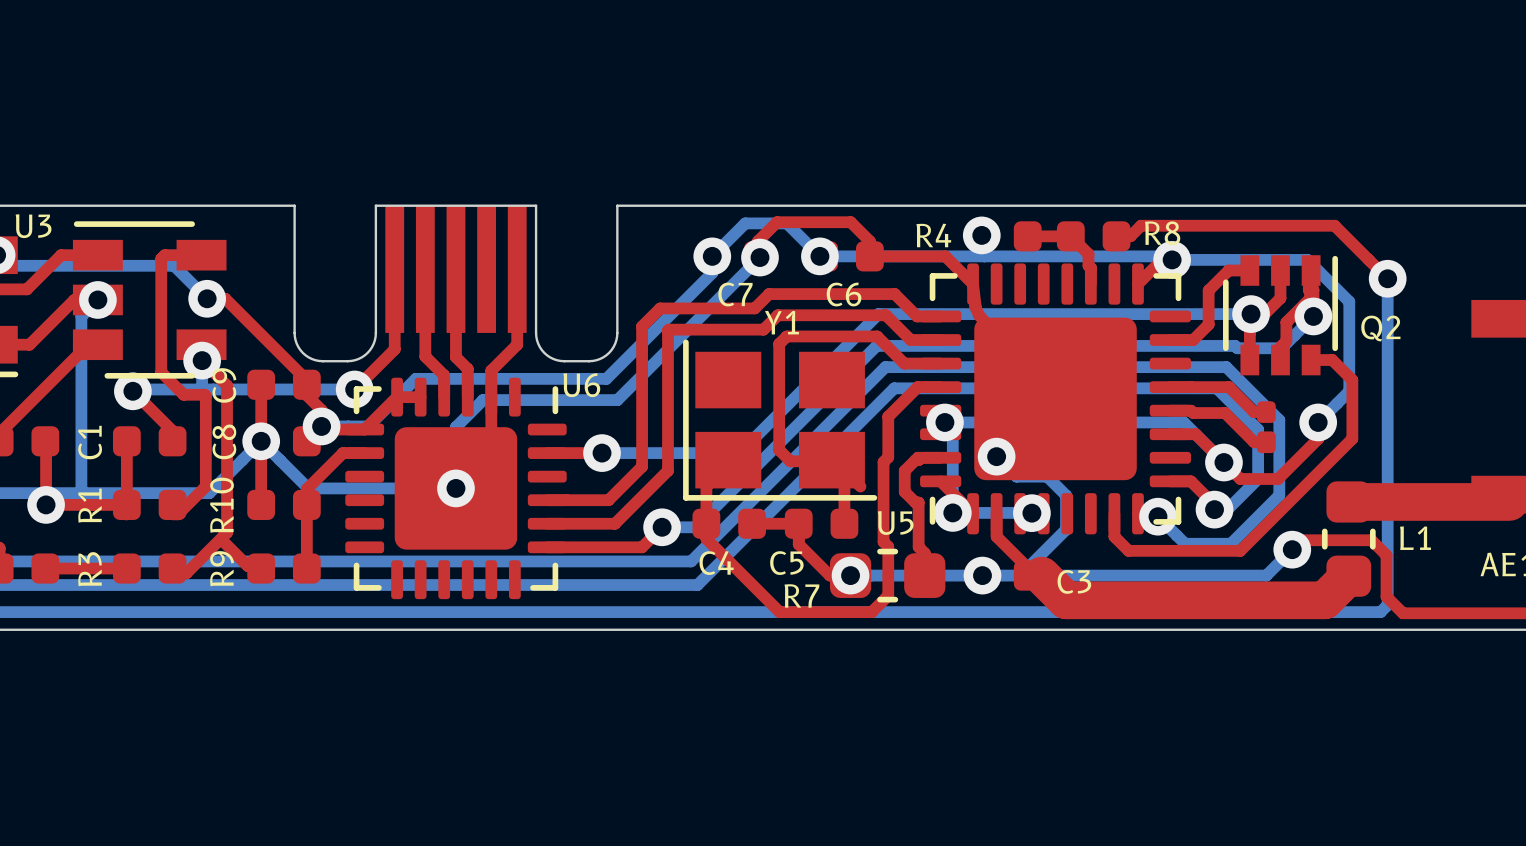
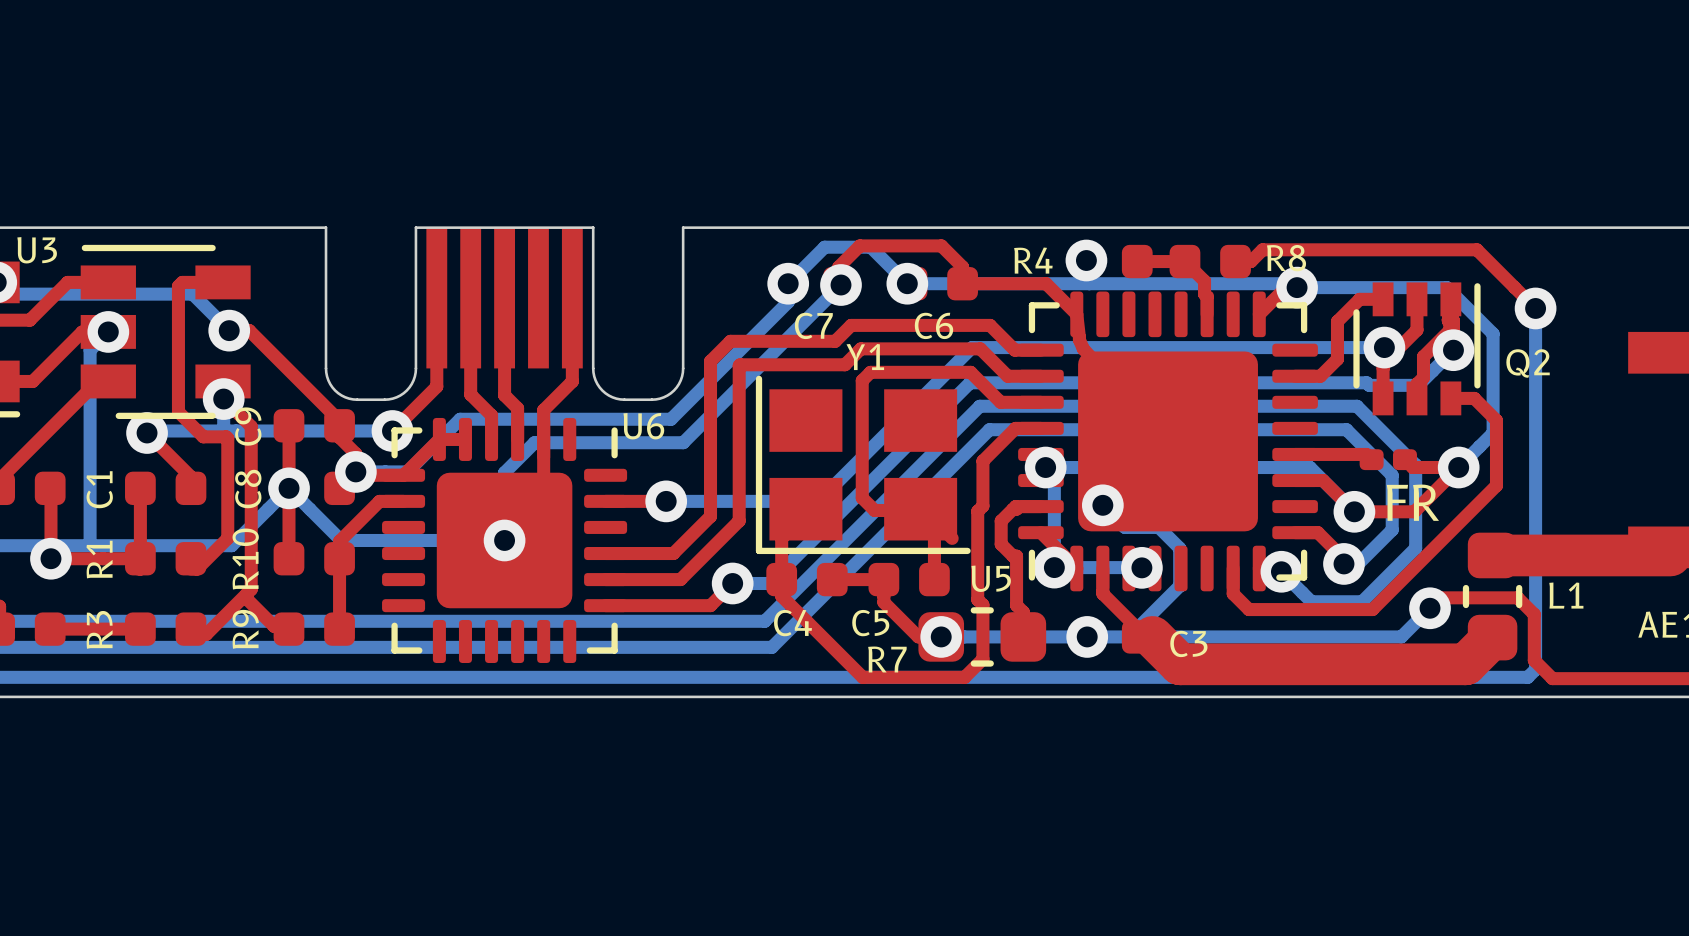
top track: (1170, 387) (1229, 387) (1254, 412) (1266, 412) -> none
top track: (1190, 410) (1193, 413) (1225, 413) (1254, 442) (1266, 442) -> (1317, 454) (1366, 454) (1371, 459)
FR: none -> (1388, 459)
top track: (1318, 422) (1318, 438) (1278, 478) (1240, 478) (1223, 462) -> (1404, 459) (1412, 467) (1458, 467) (1414, 511) (1354, 511)
part: (1266, 427) -> none

